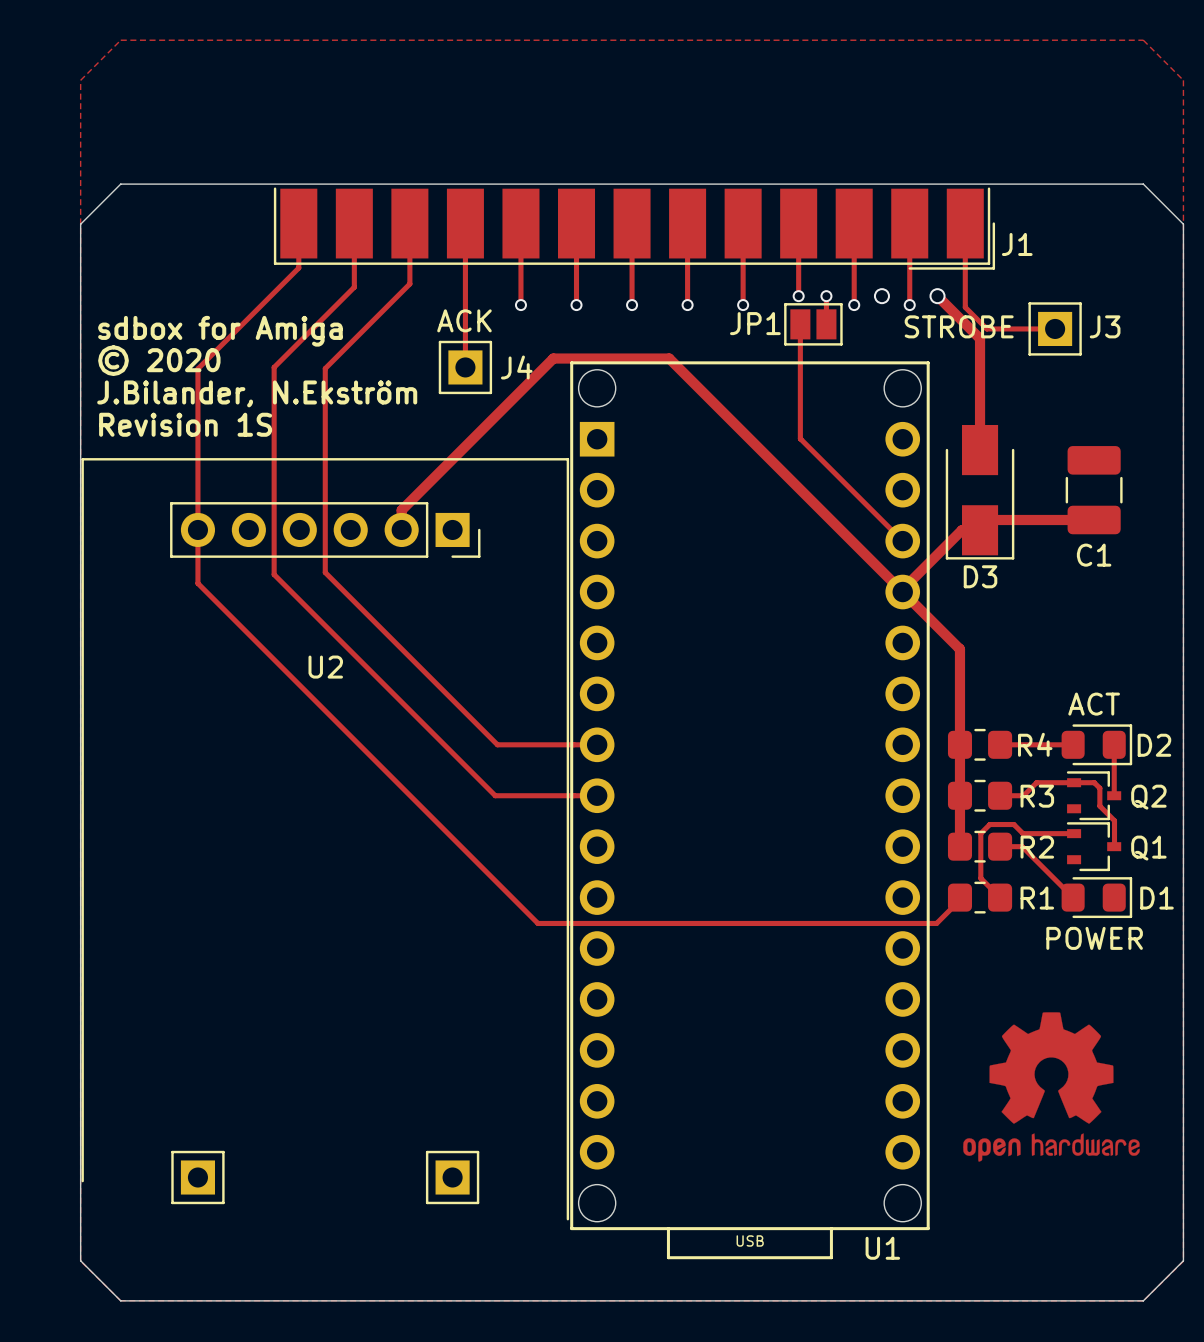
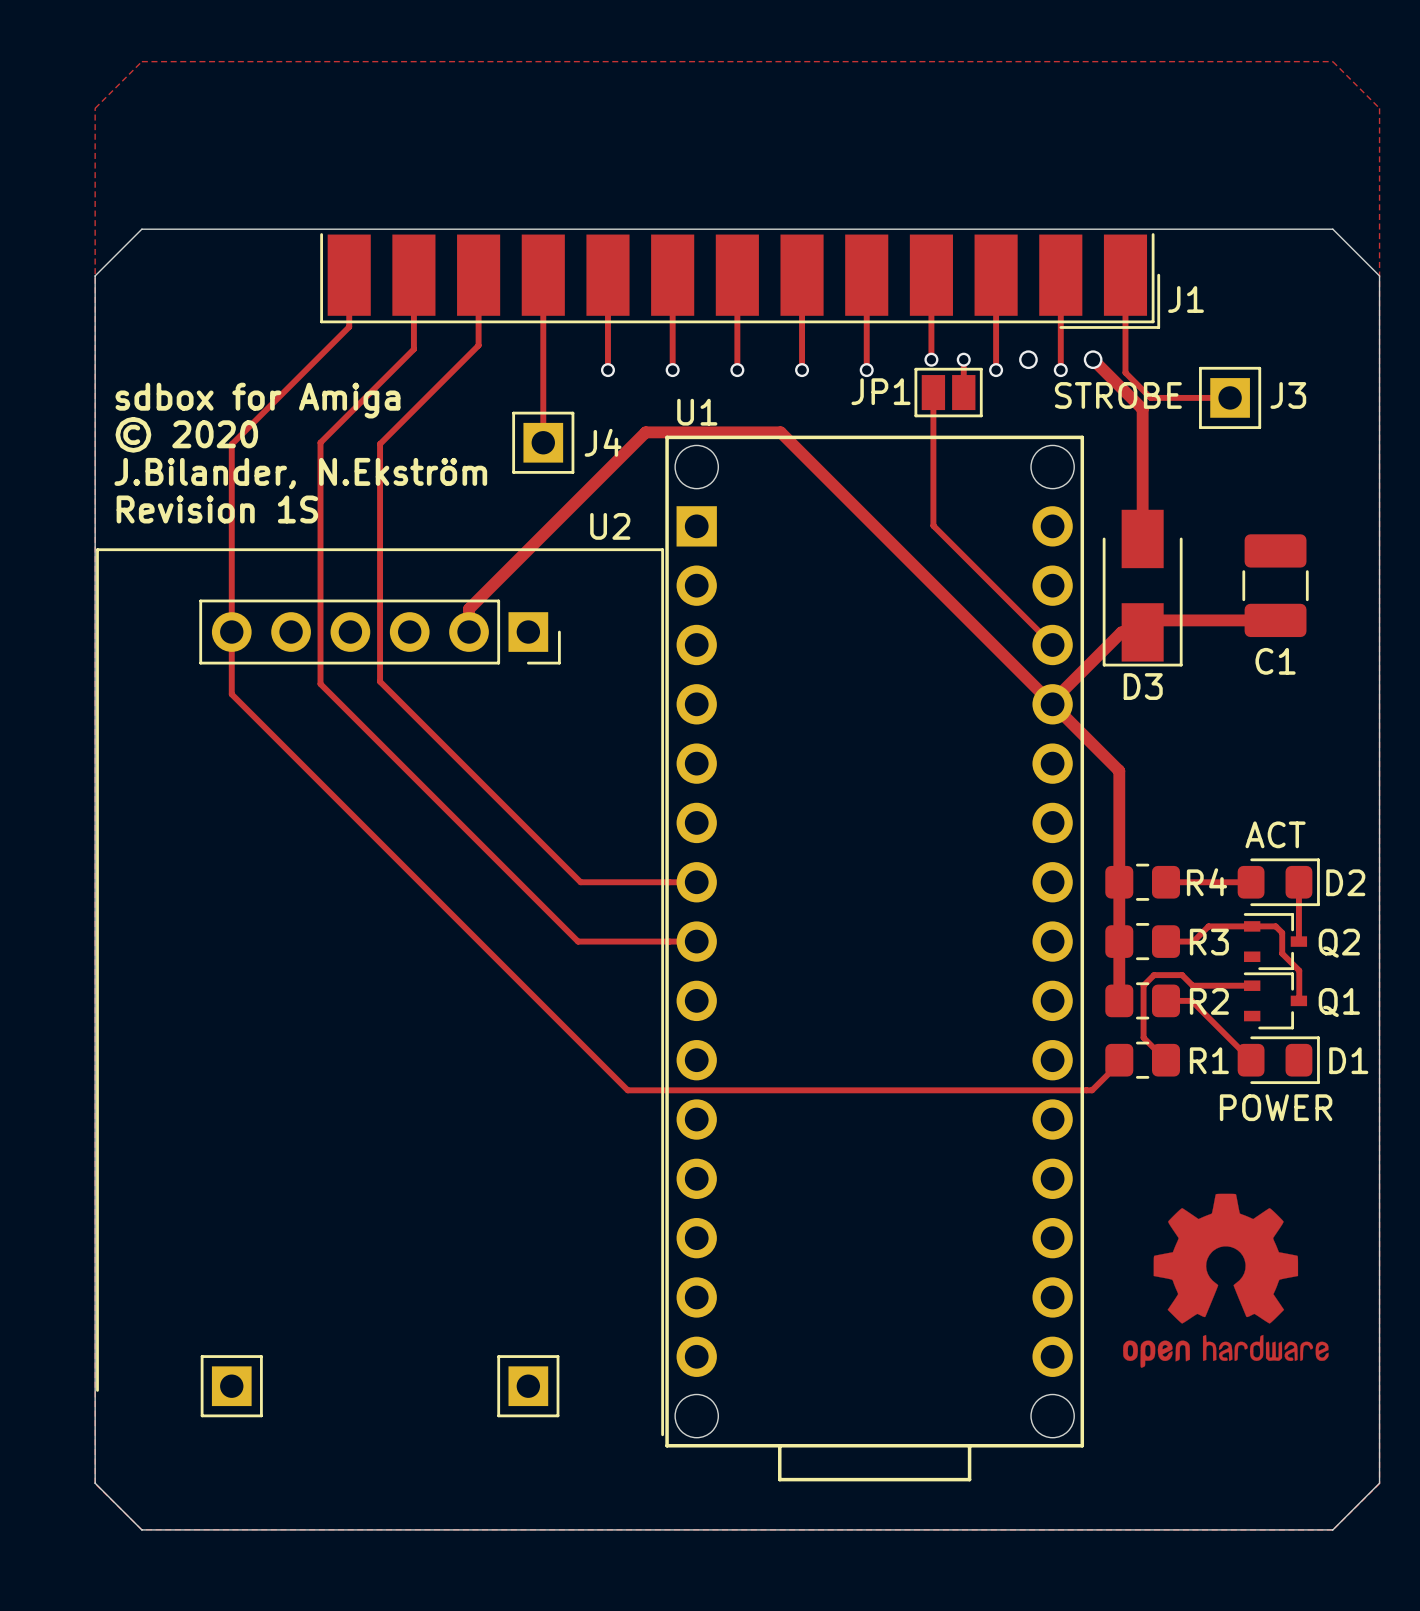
text: ACK (464, 320) -> none
U2 name position: U2 (325, 667) -> U2 (610, 526)
U1 text: USB (750, 1240) -> none
U1 name position: U1 (882, 1248) -> U1 (697, 412)

